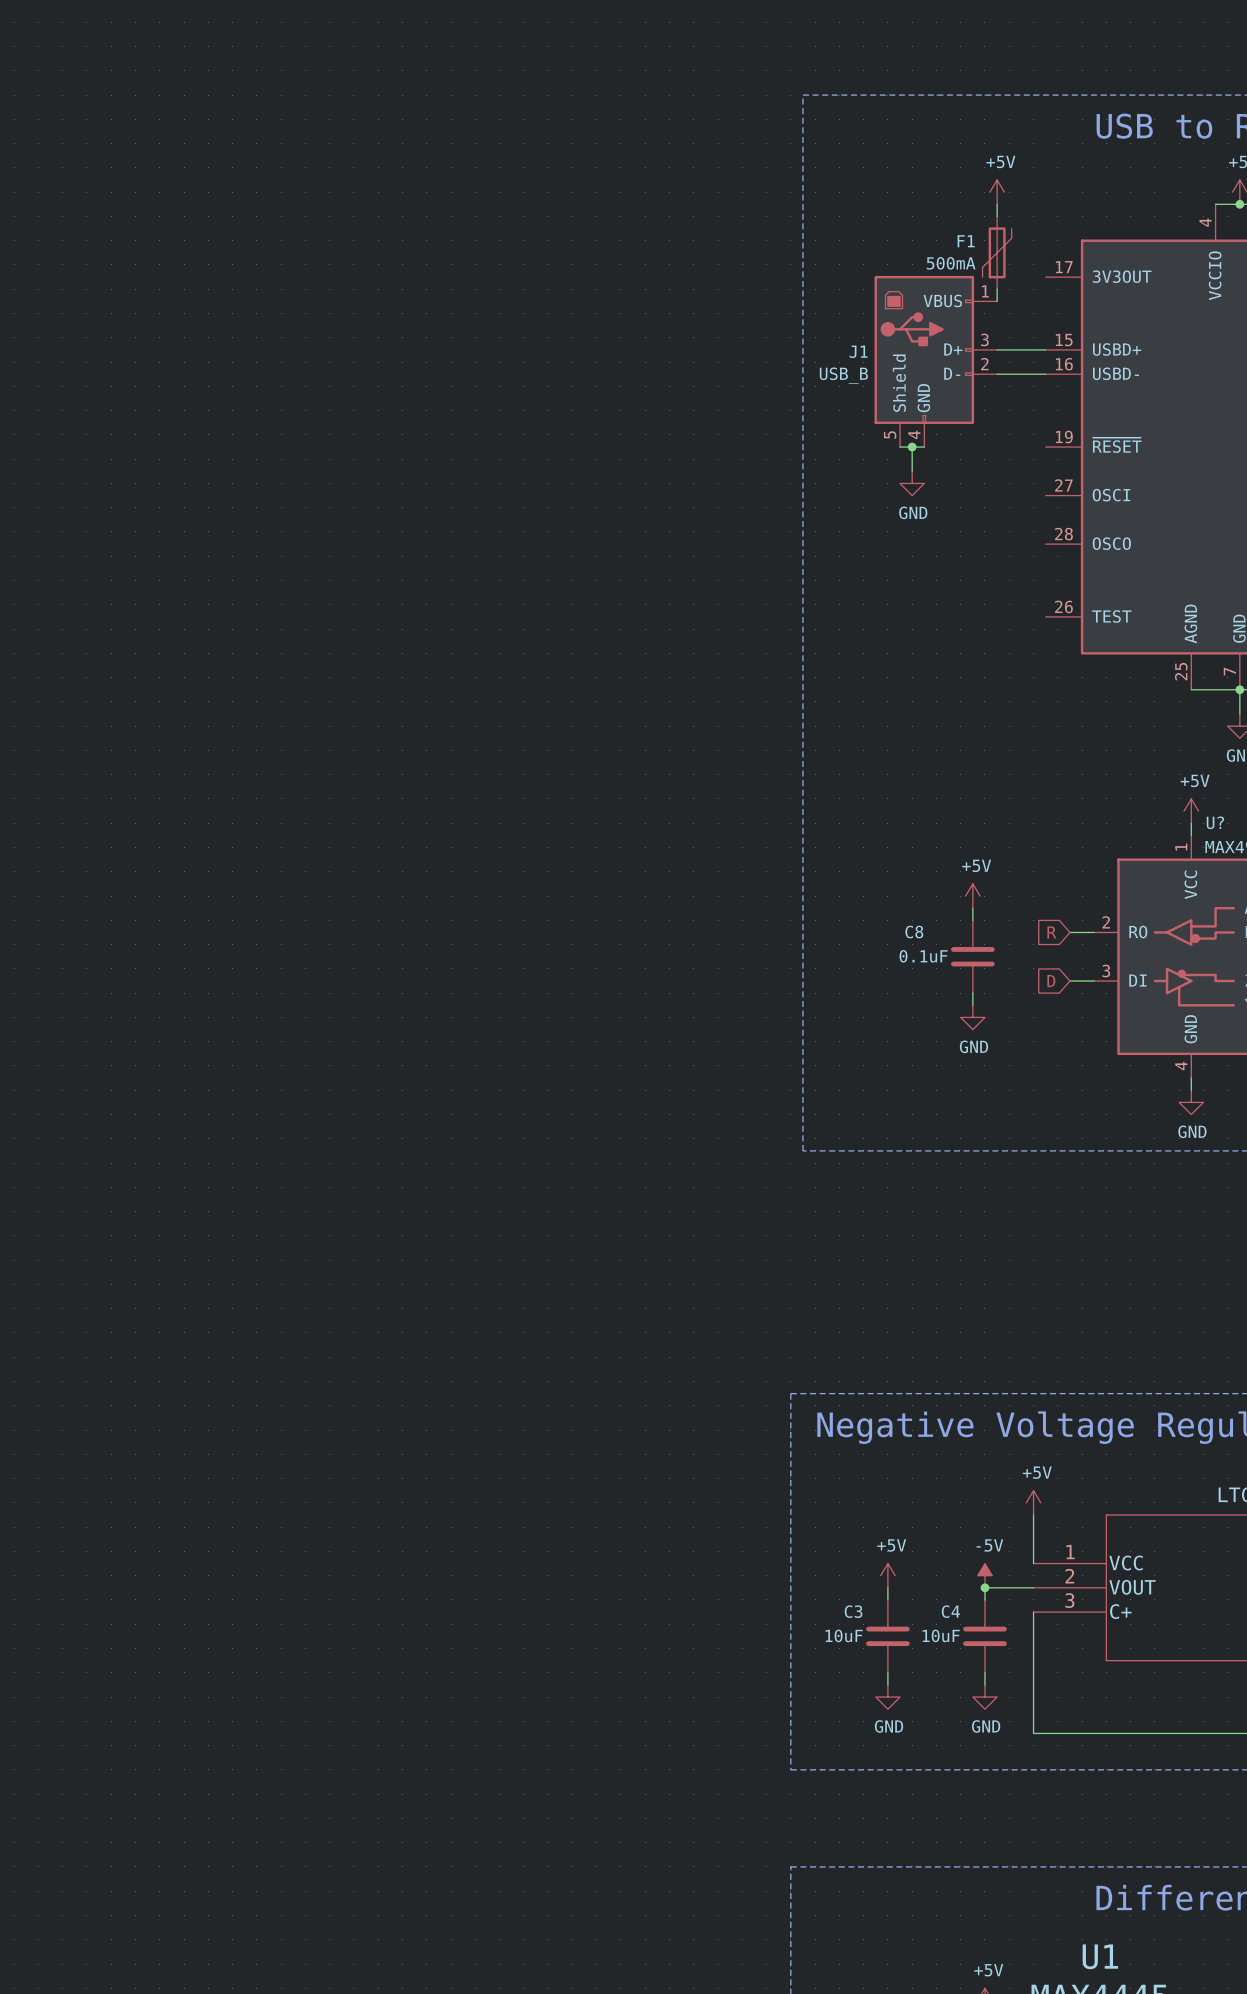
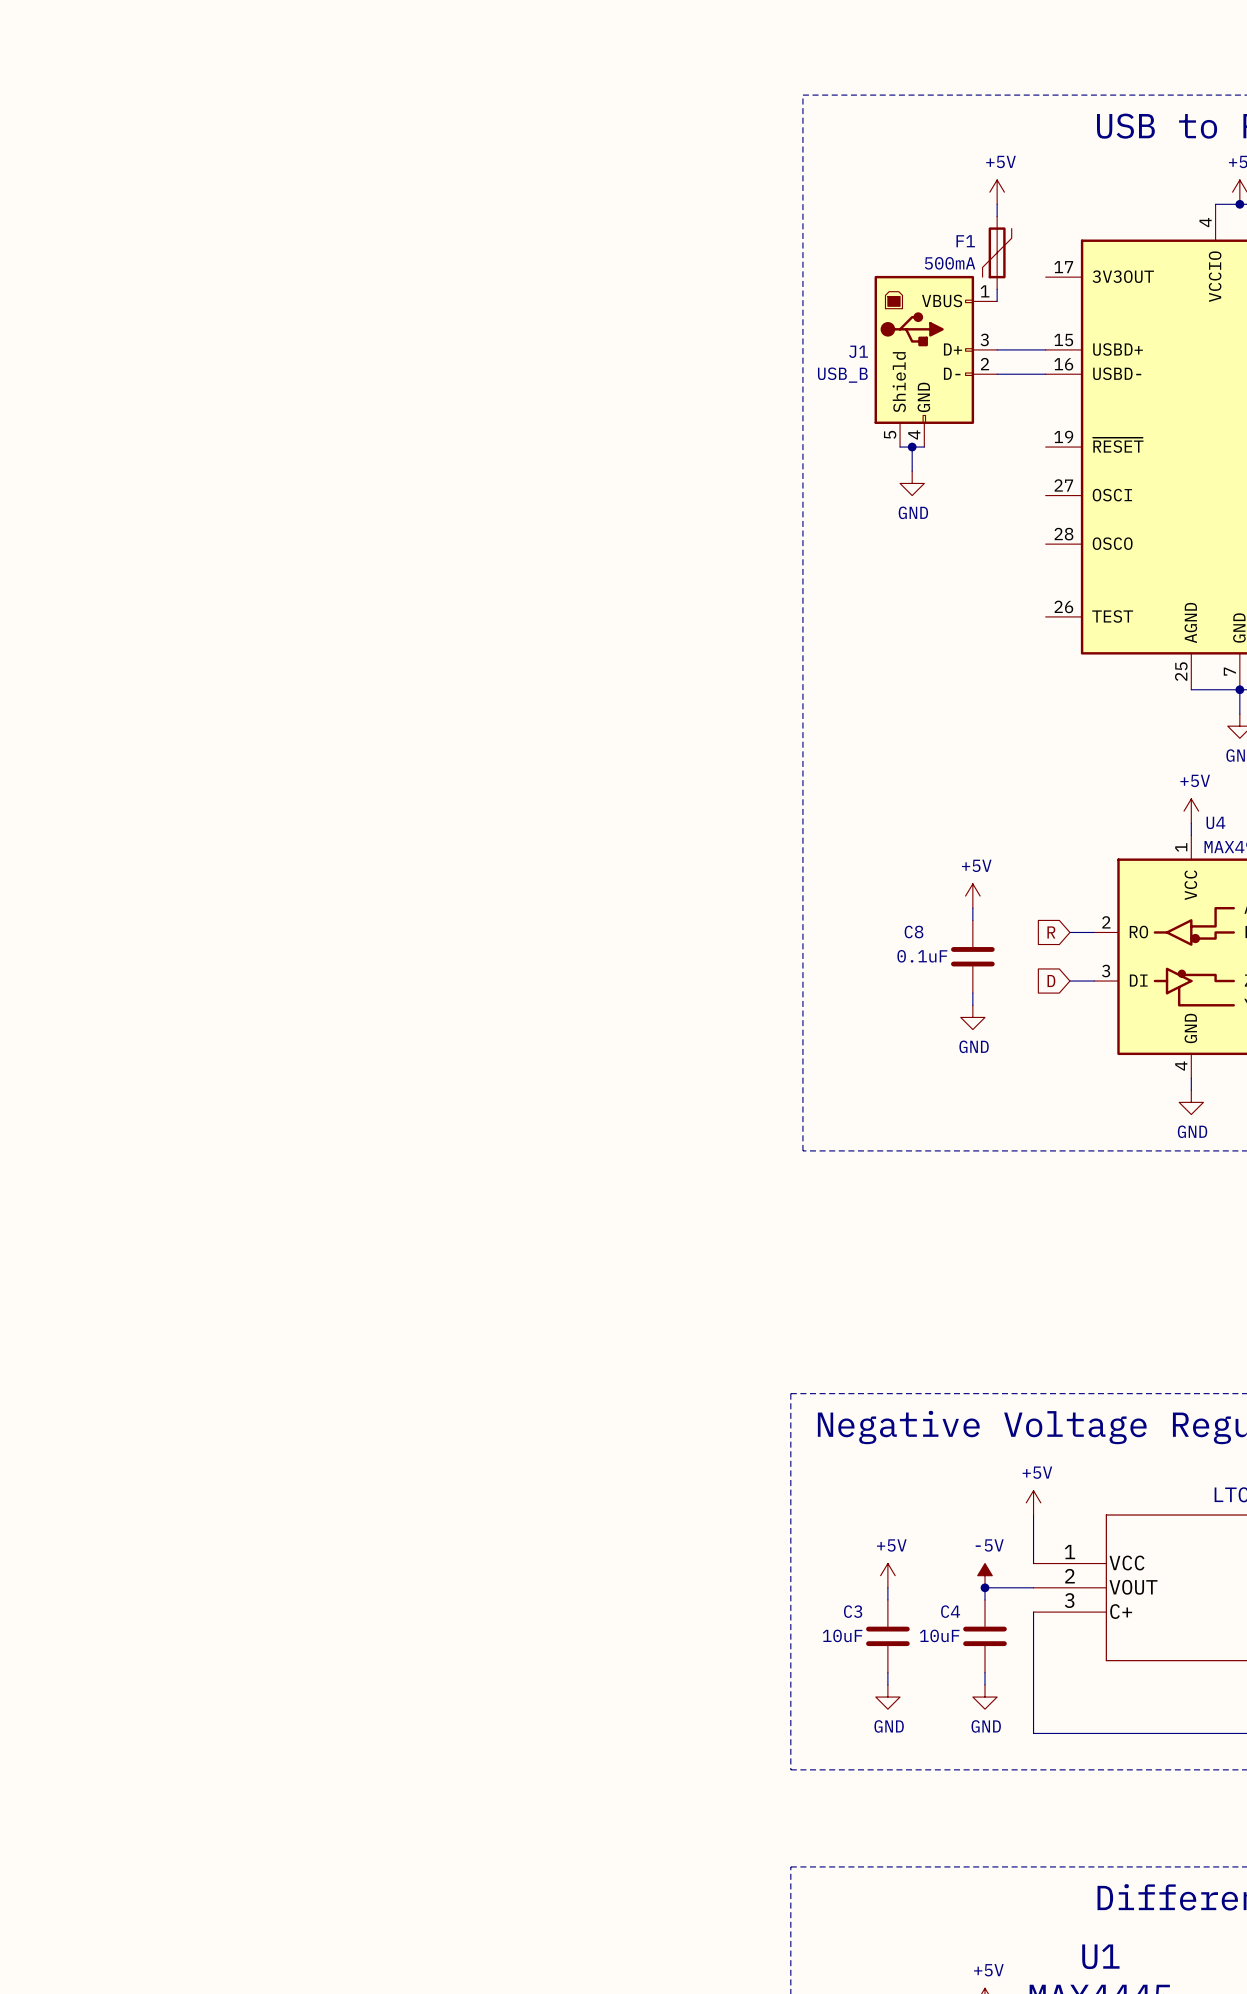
U? name: U? (1215, 822) -> U4 (1215, 822)

